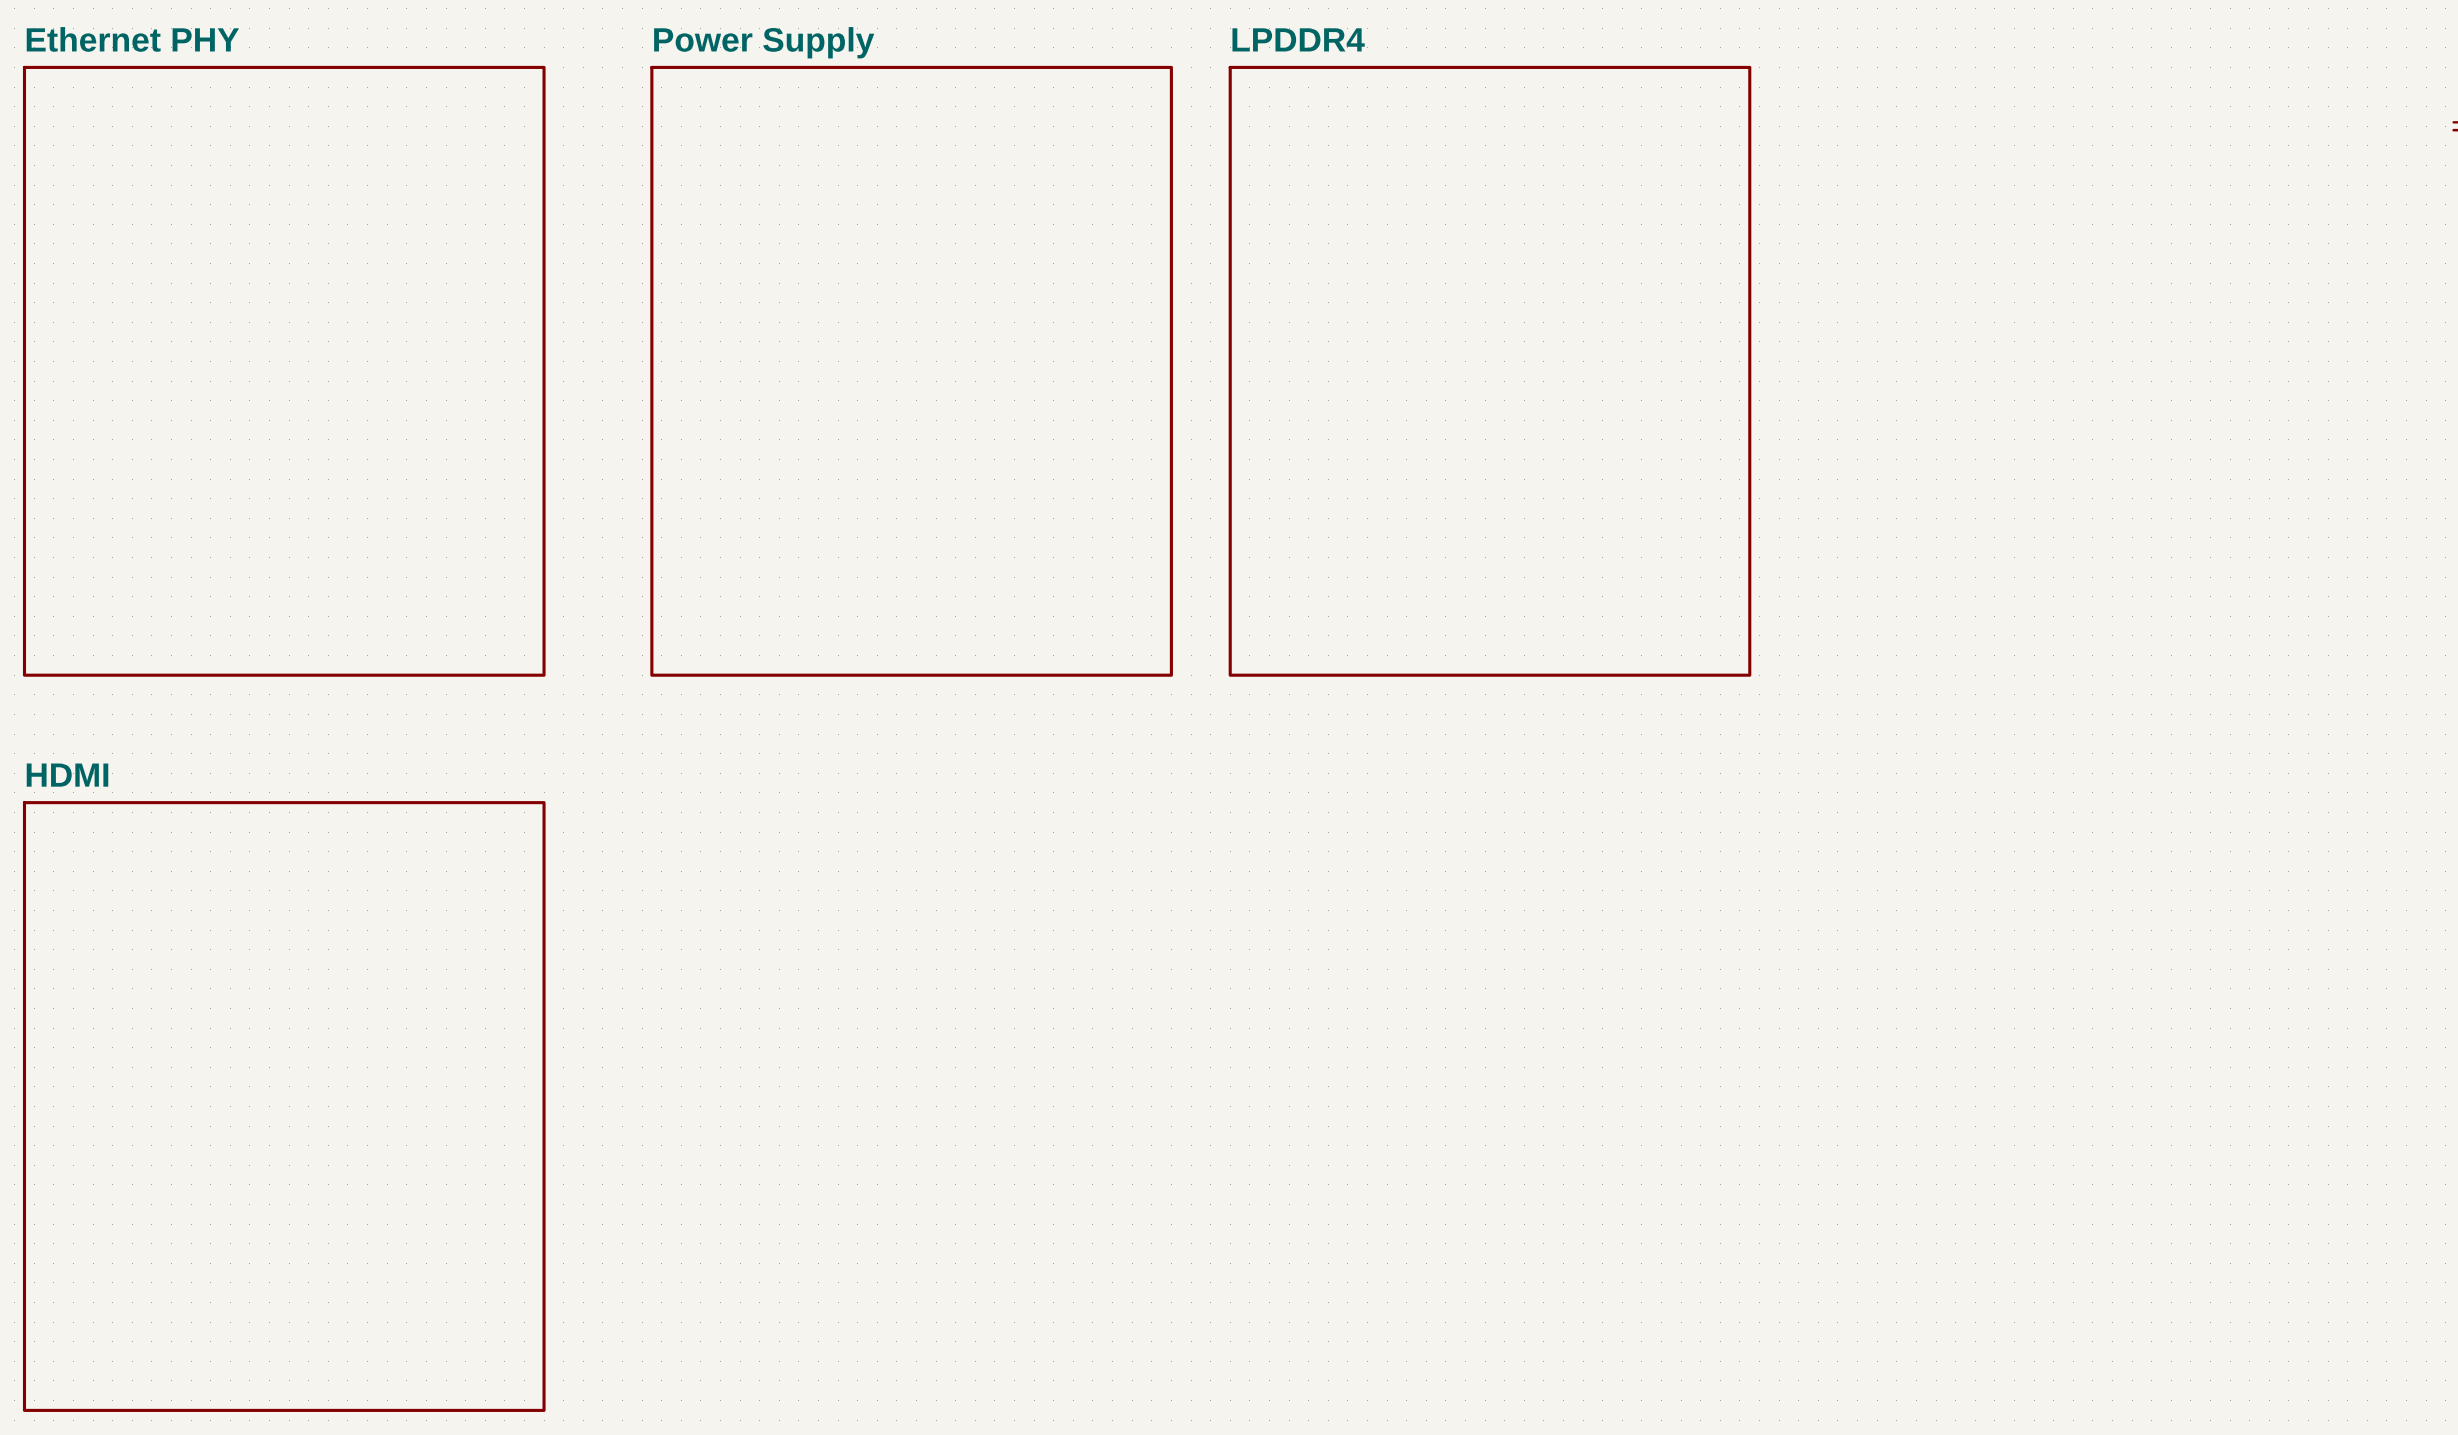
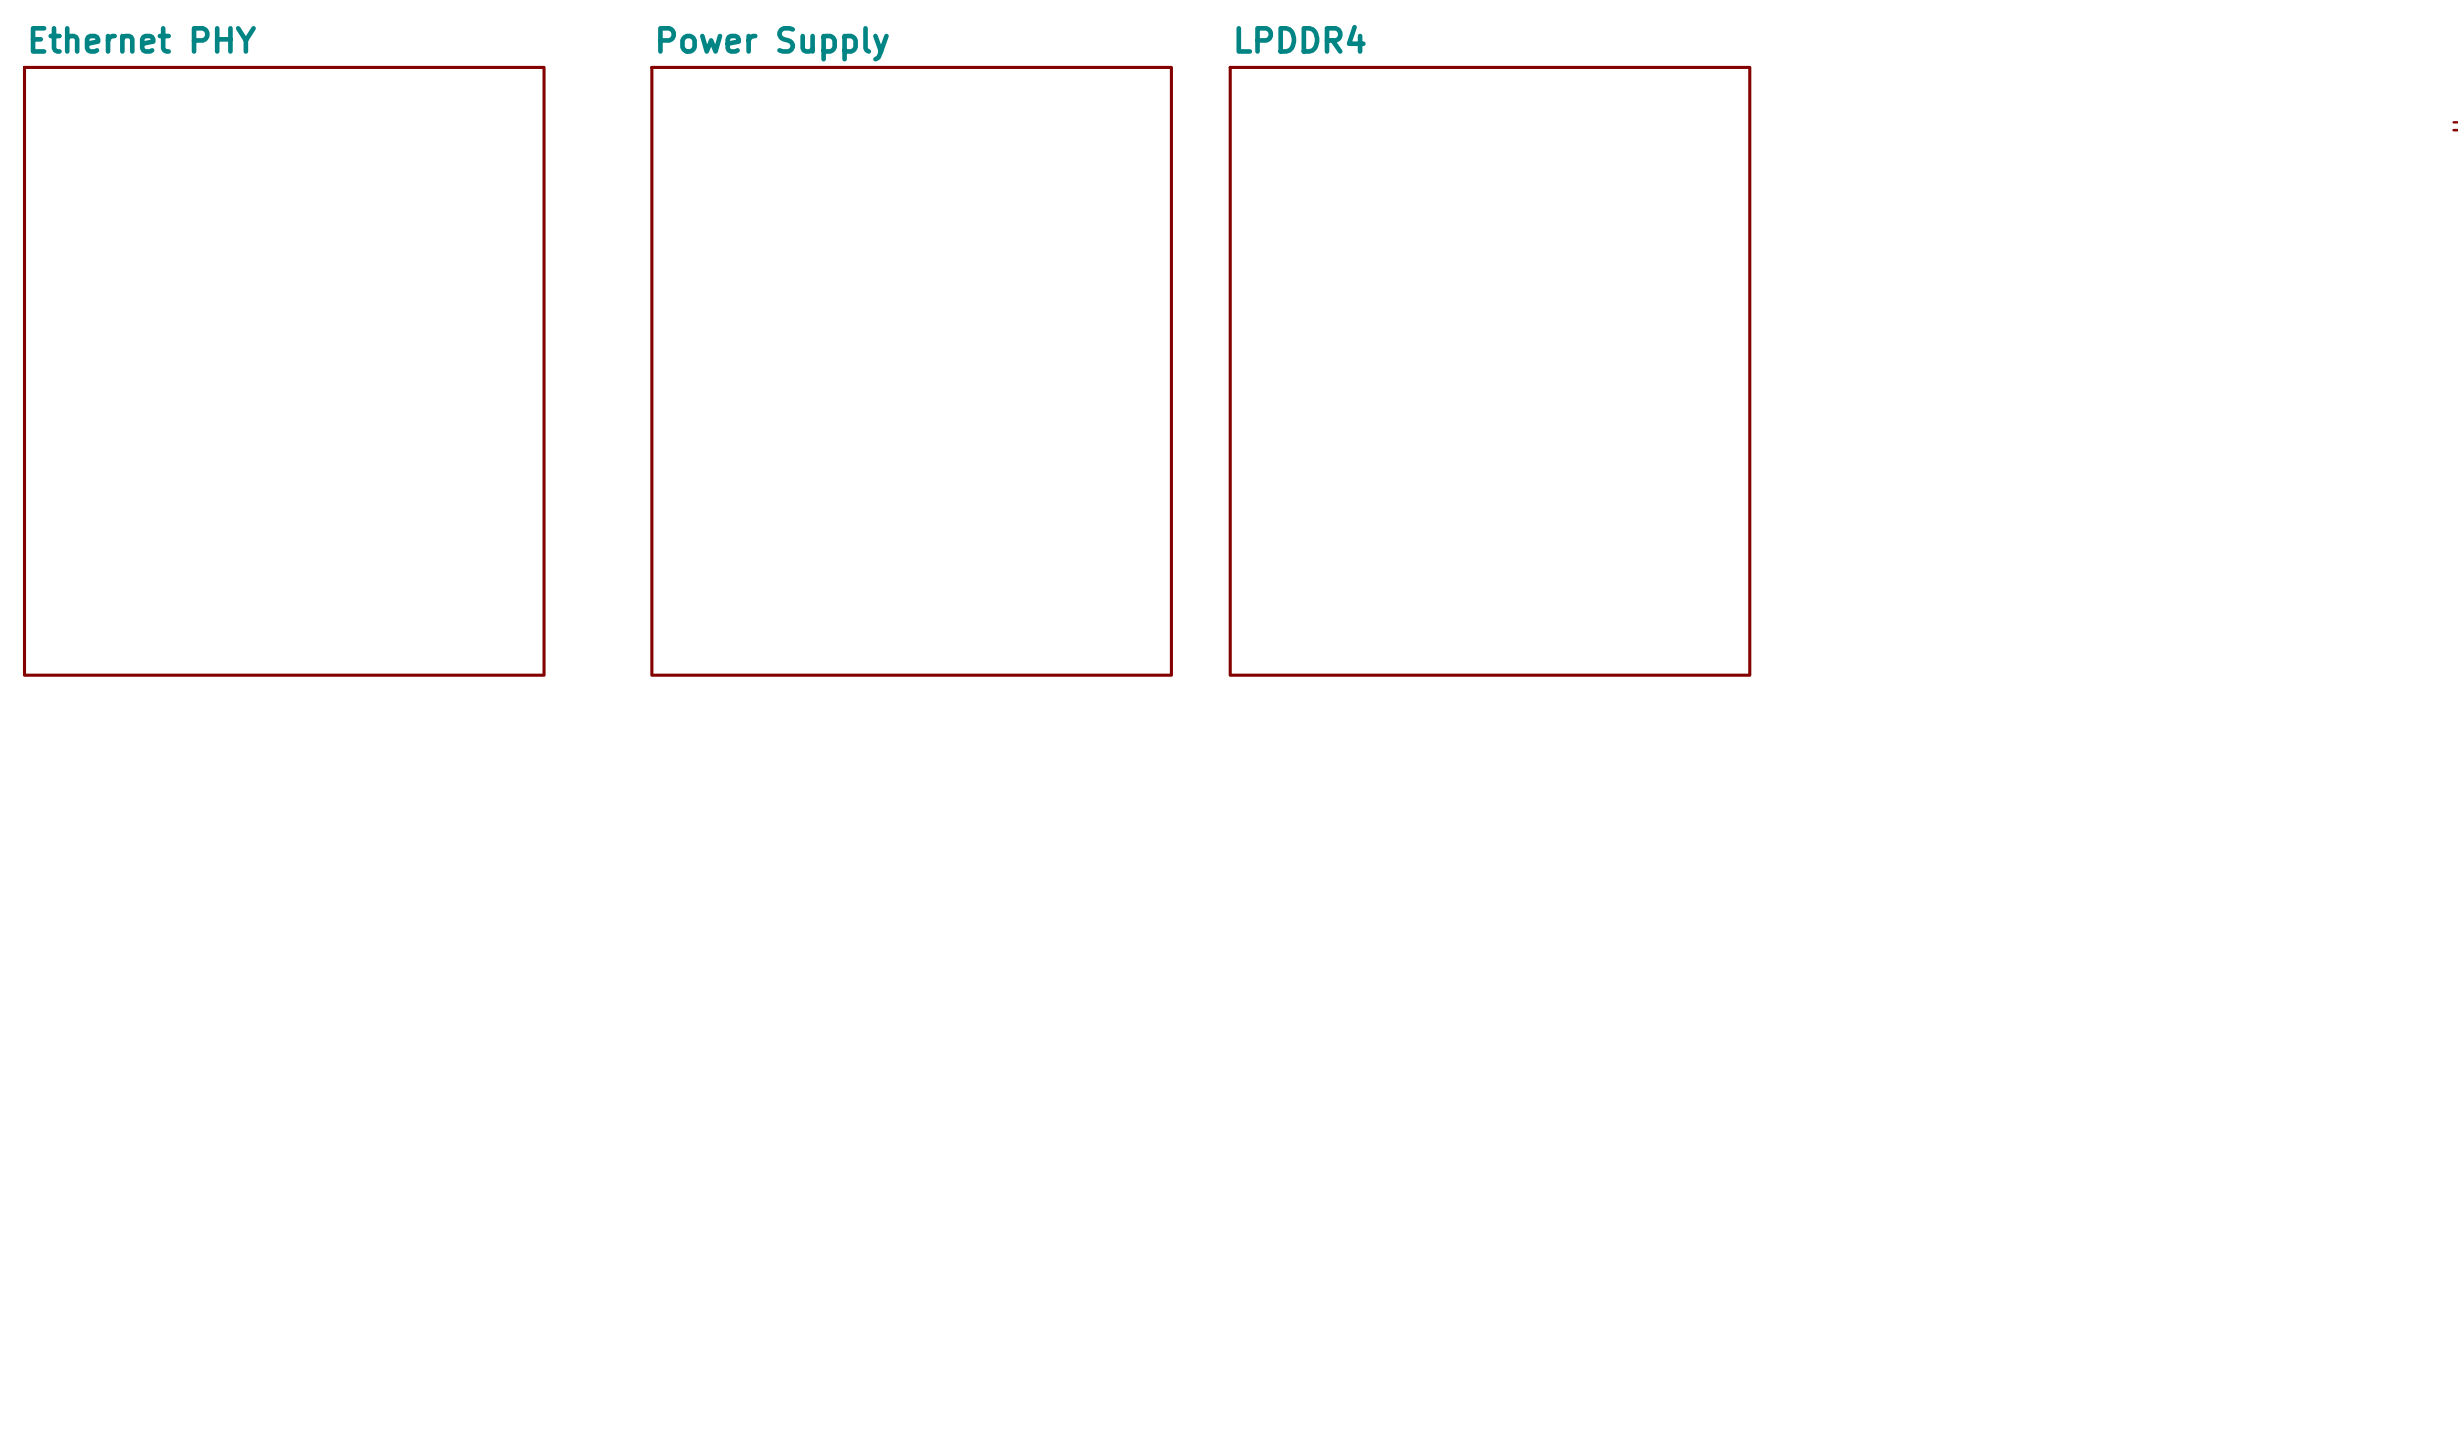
sheet HDMI: (284, 1106) -> none

